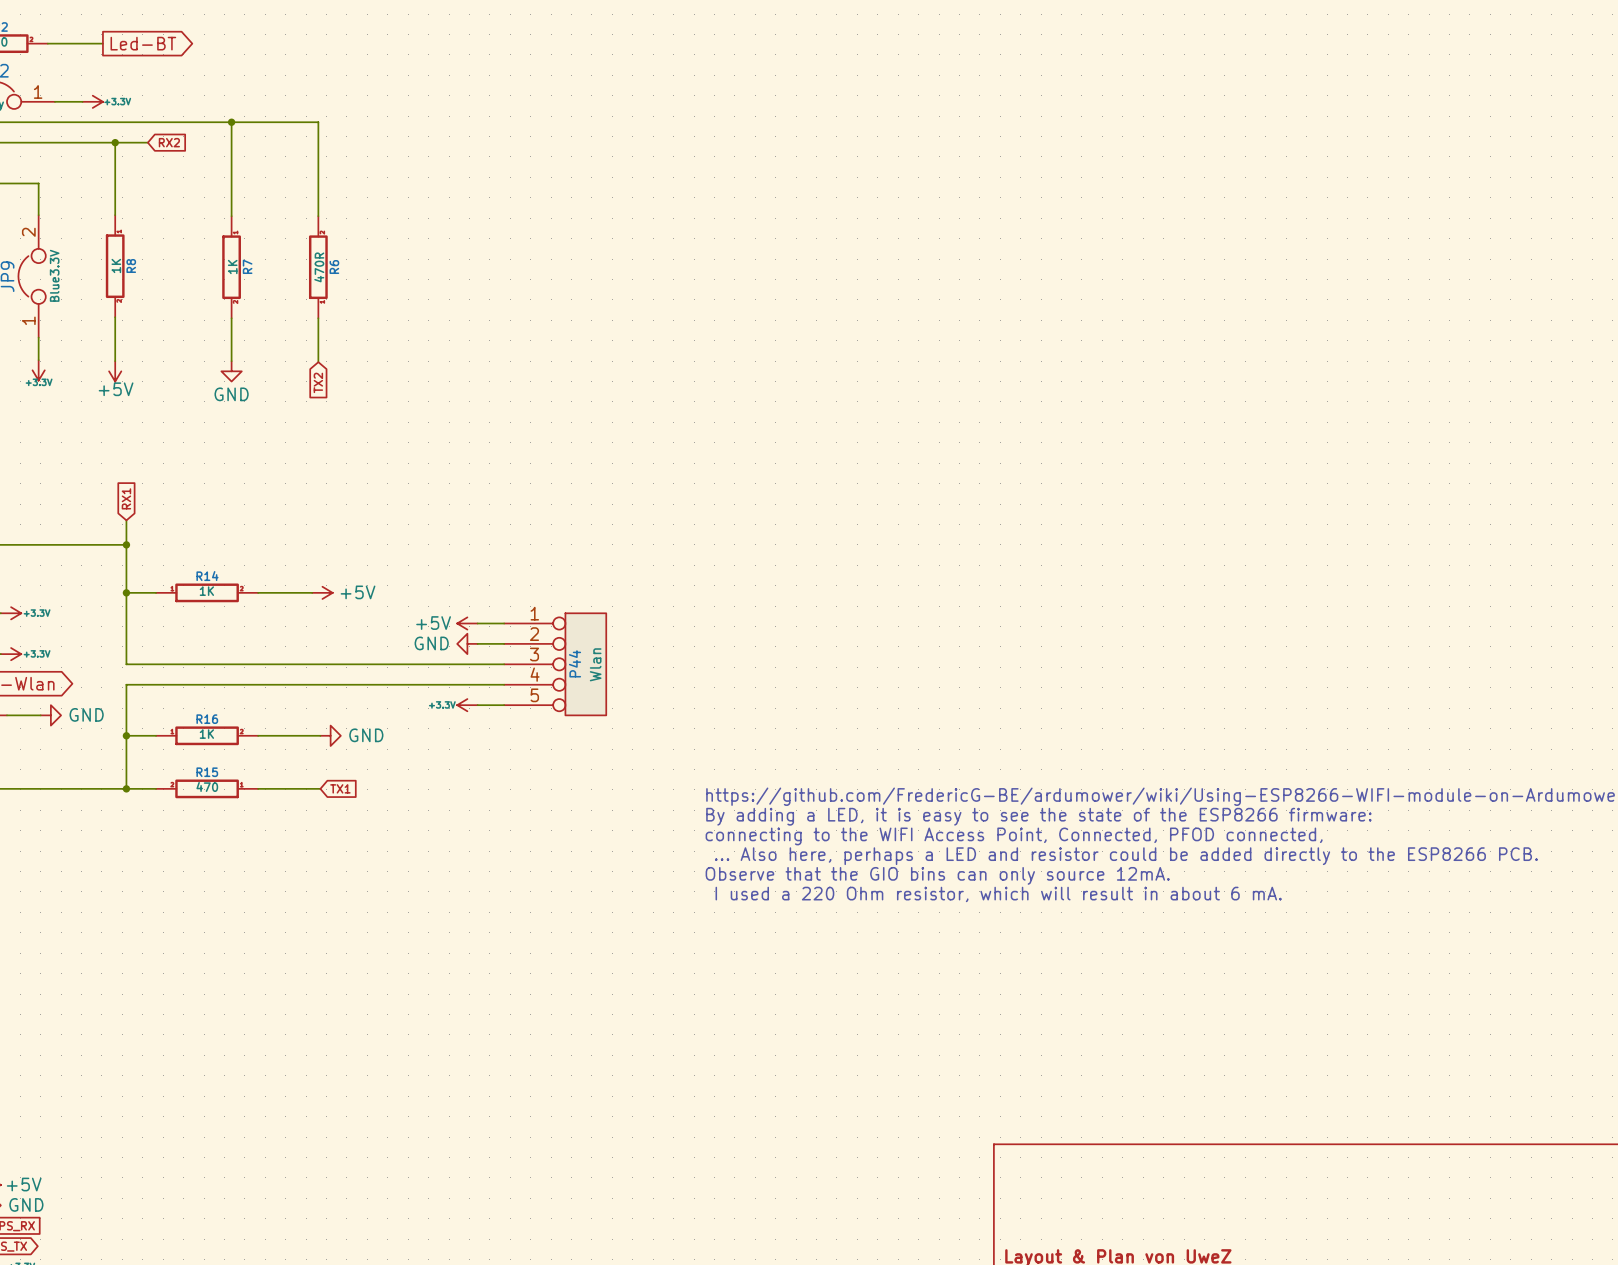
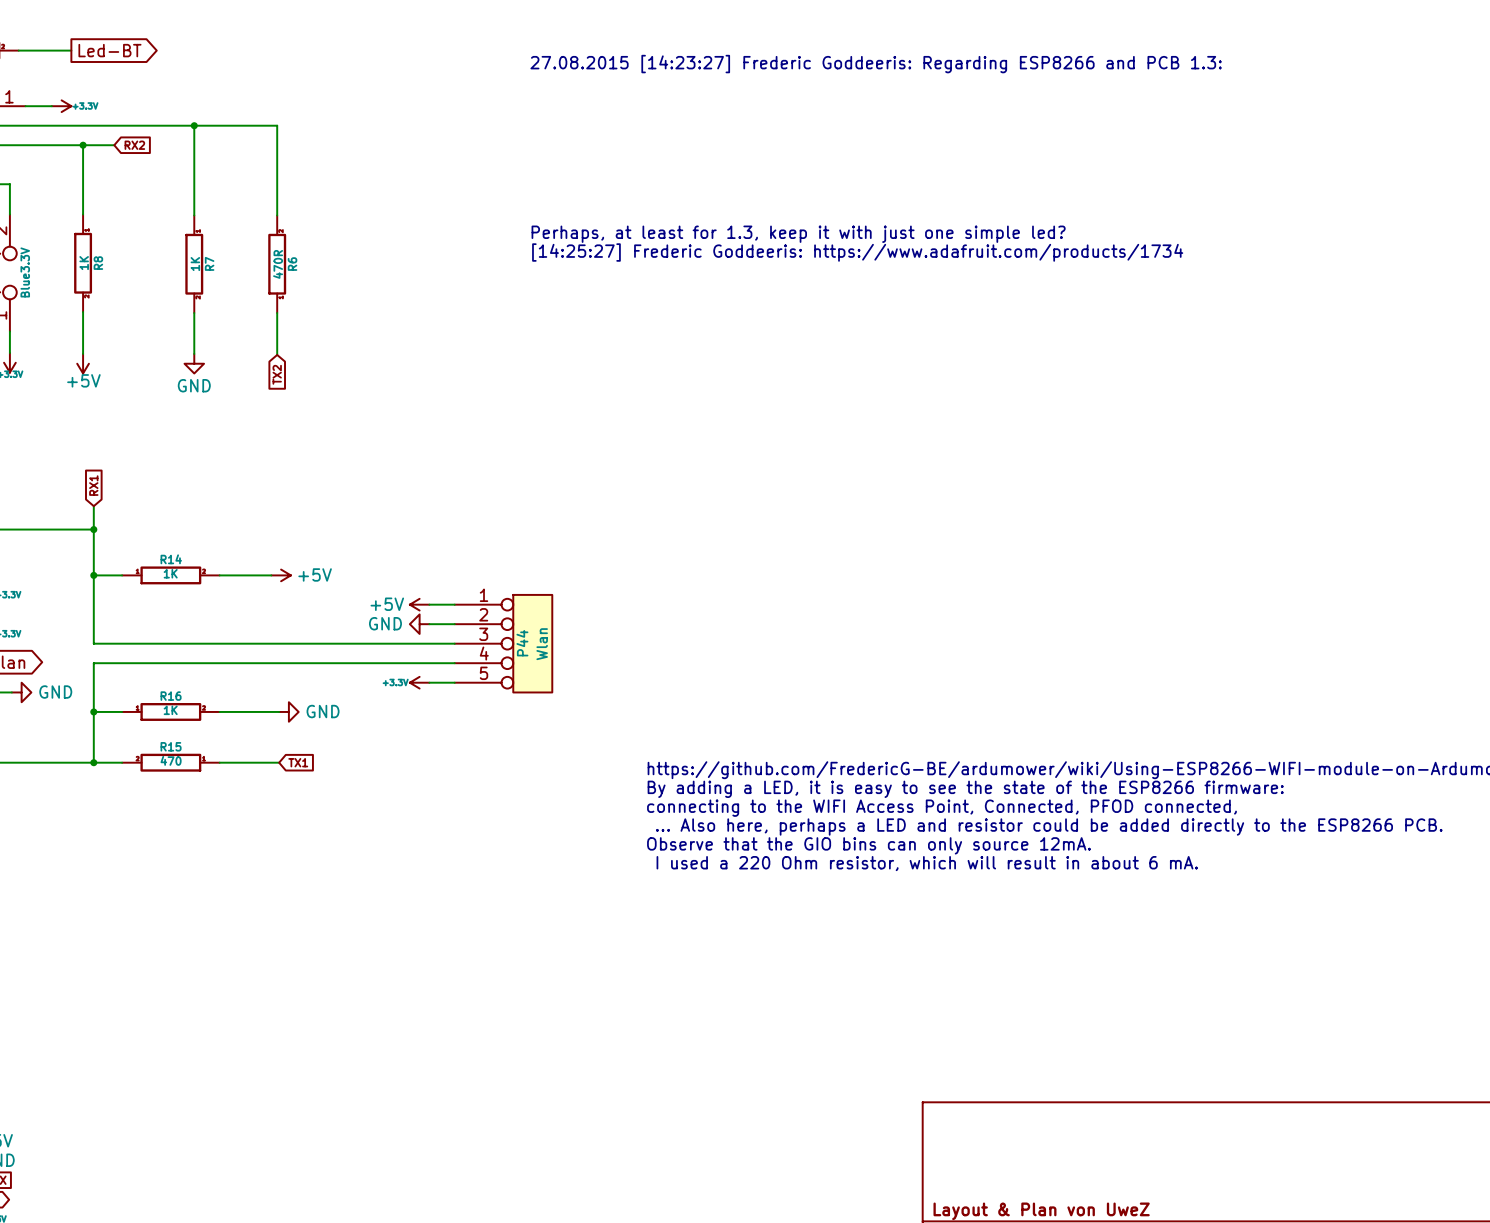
text: none -> 27.08.2015 [14:23:27] Frederic Goddeeris: Regarding ESP8266 and PCB 1.3: (876, 64)
text: none -> Perhaps, at least for 1.3, keep it with just one simple led? (798, 234)
text: none -> [14:25:27] Frederic Goddeeris: https://www.adafruit.com/products/1734 (857, 252)

